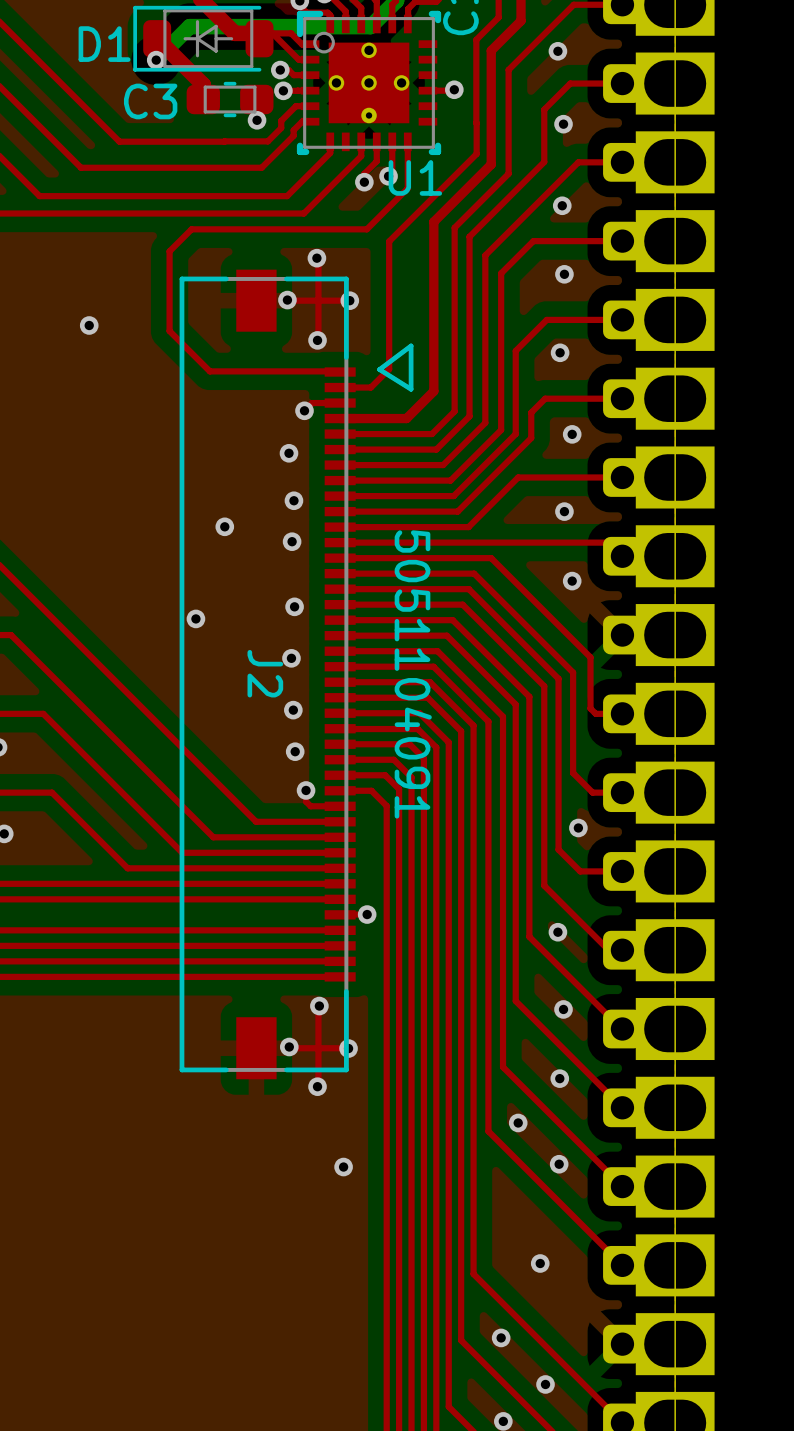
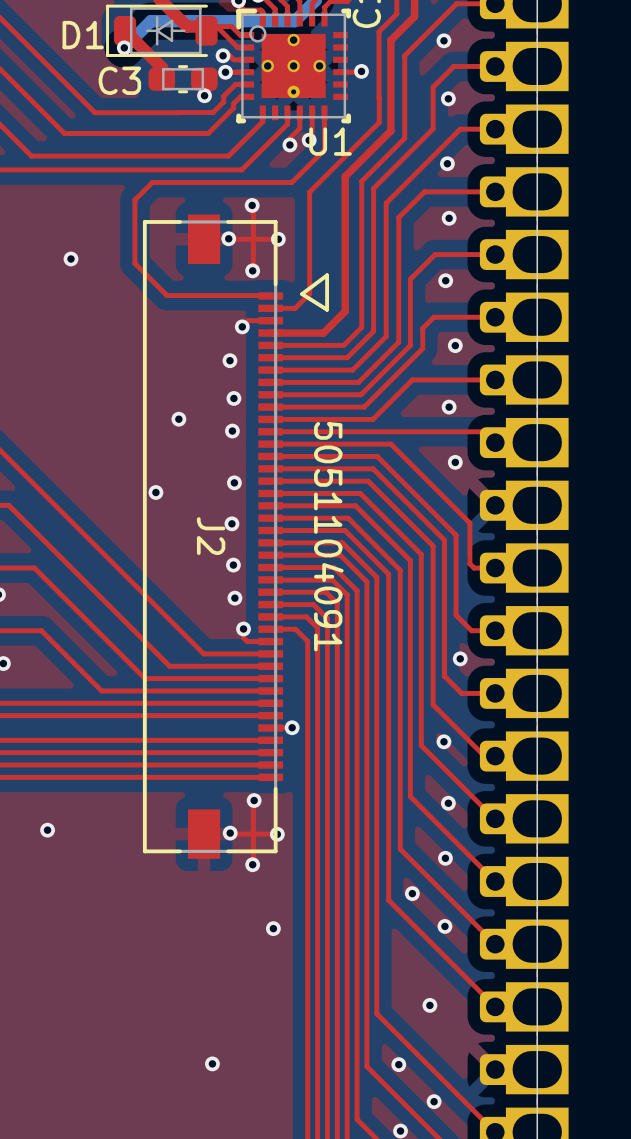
via: none -> (47, 830)
via: none -> (212, 1063)

